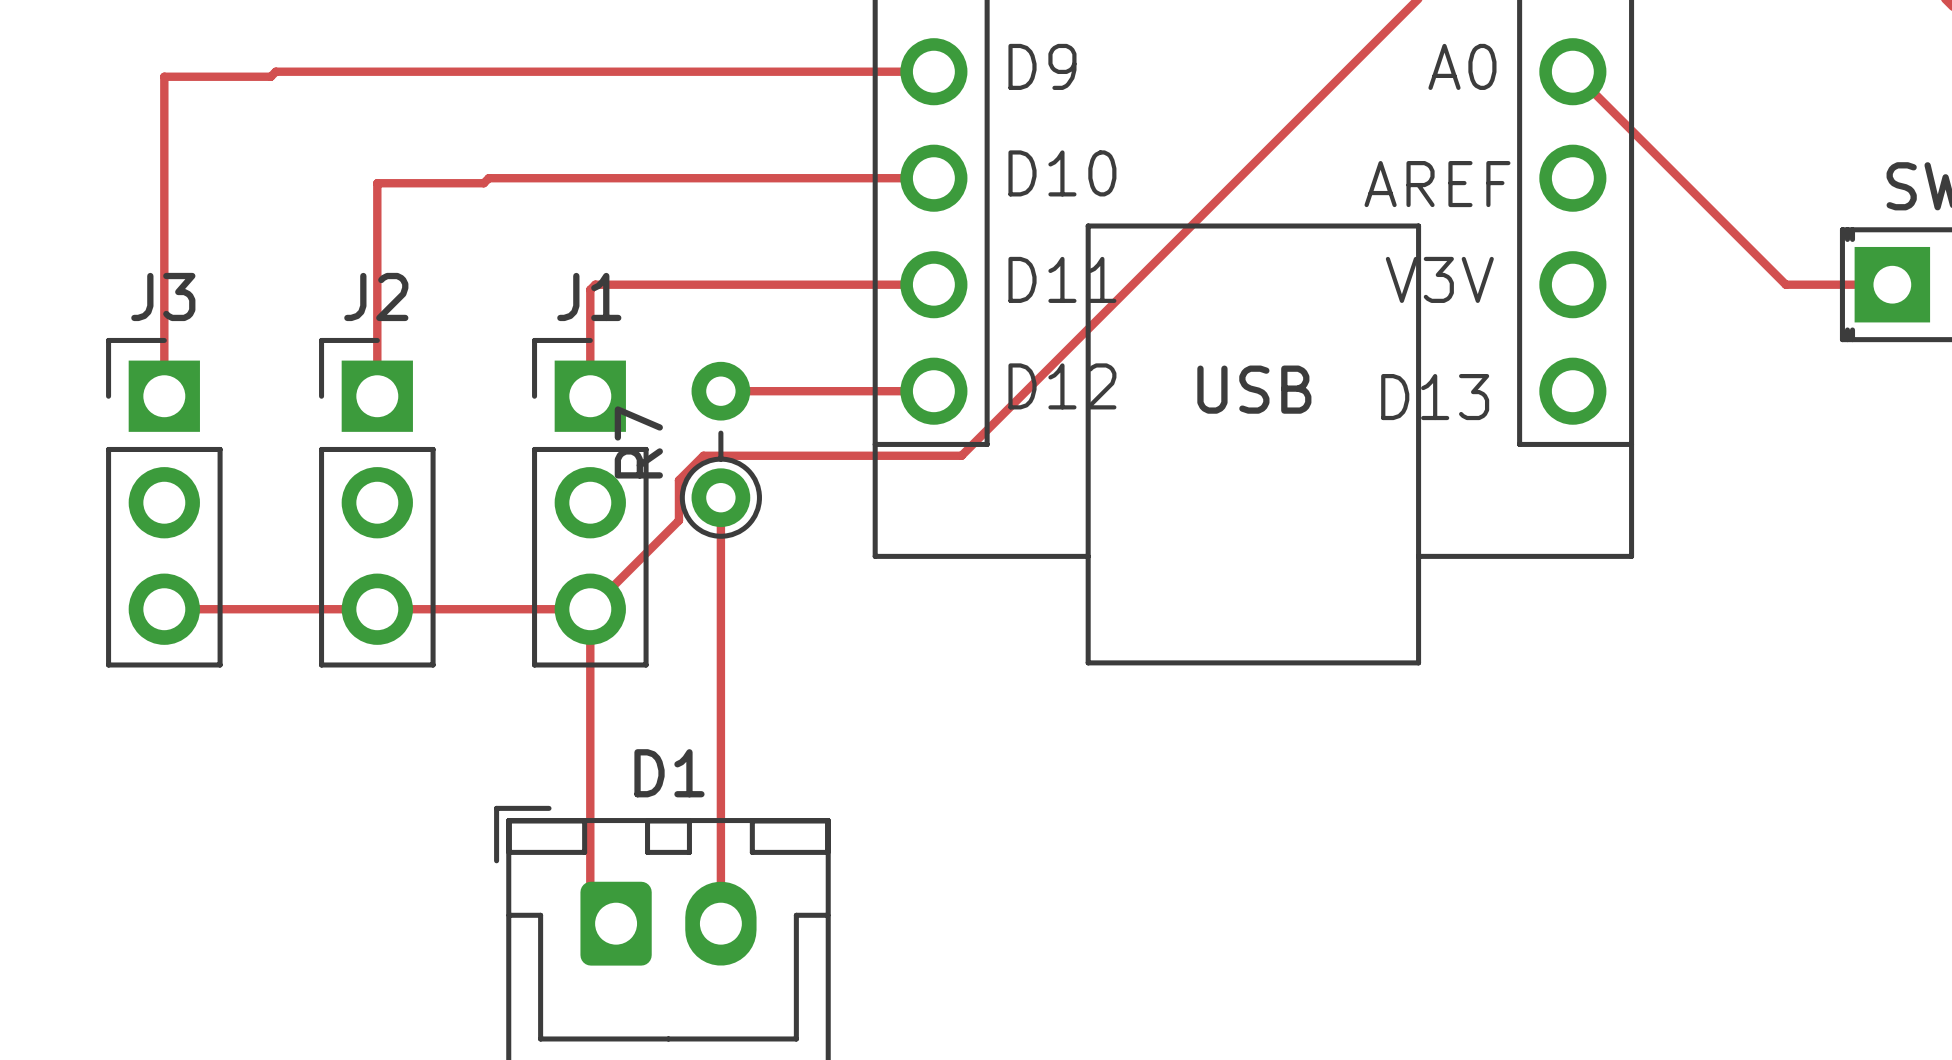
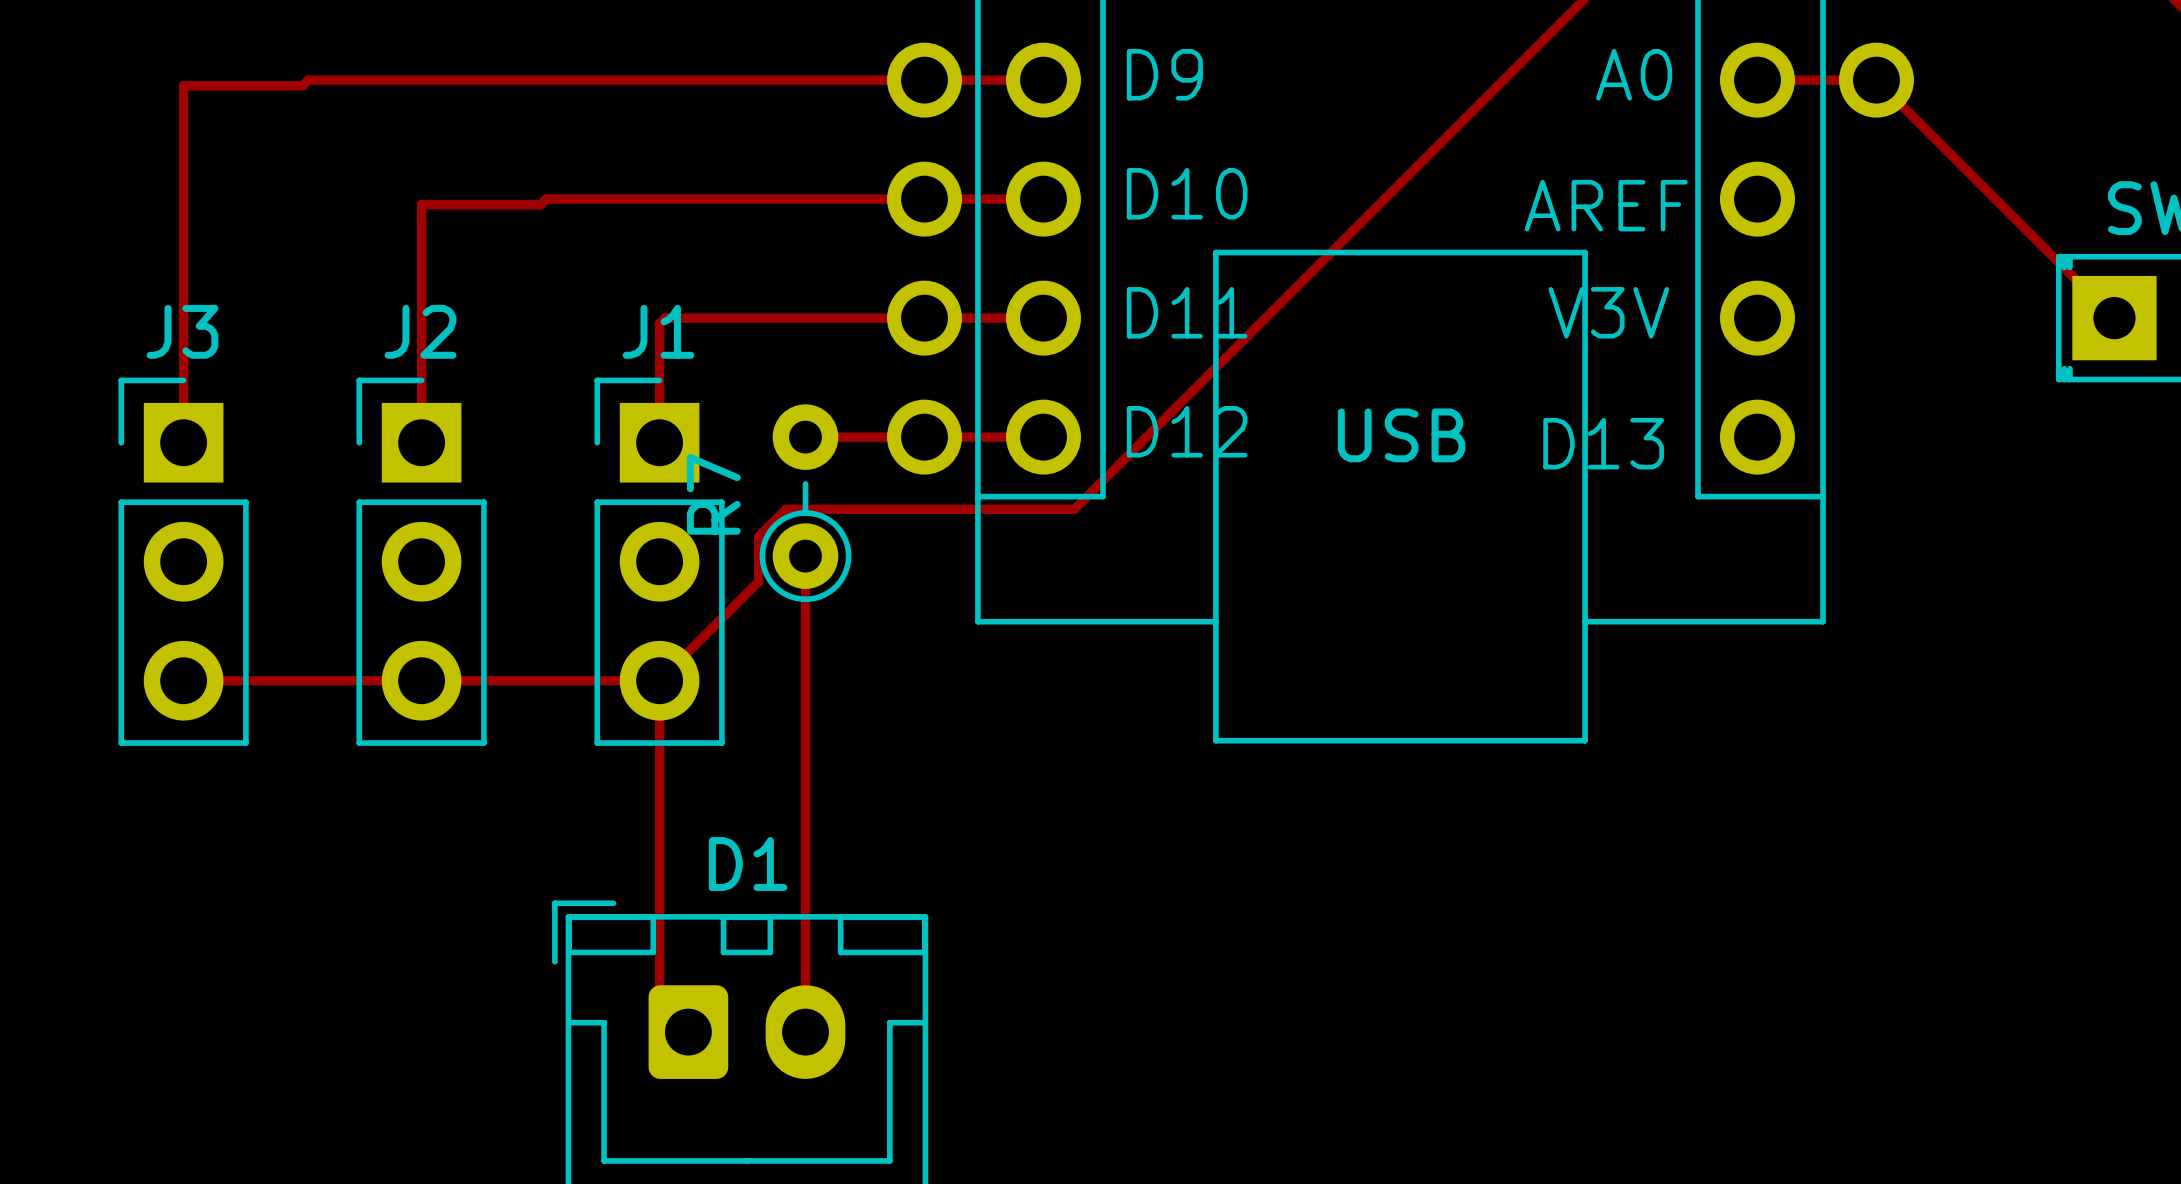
part: none -> (924, 80)
track: (1572, 71) (1785, 284) (1892, 284) -> (1757, 80) (1876, 80) (2114, 318)
part: none -> (1876, 80)
part: none -> (924, 199)
part: none -> (924, 318)
part: none -> (924, 437)

